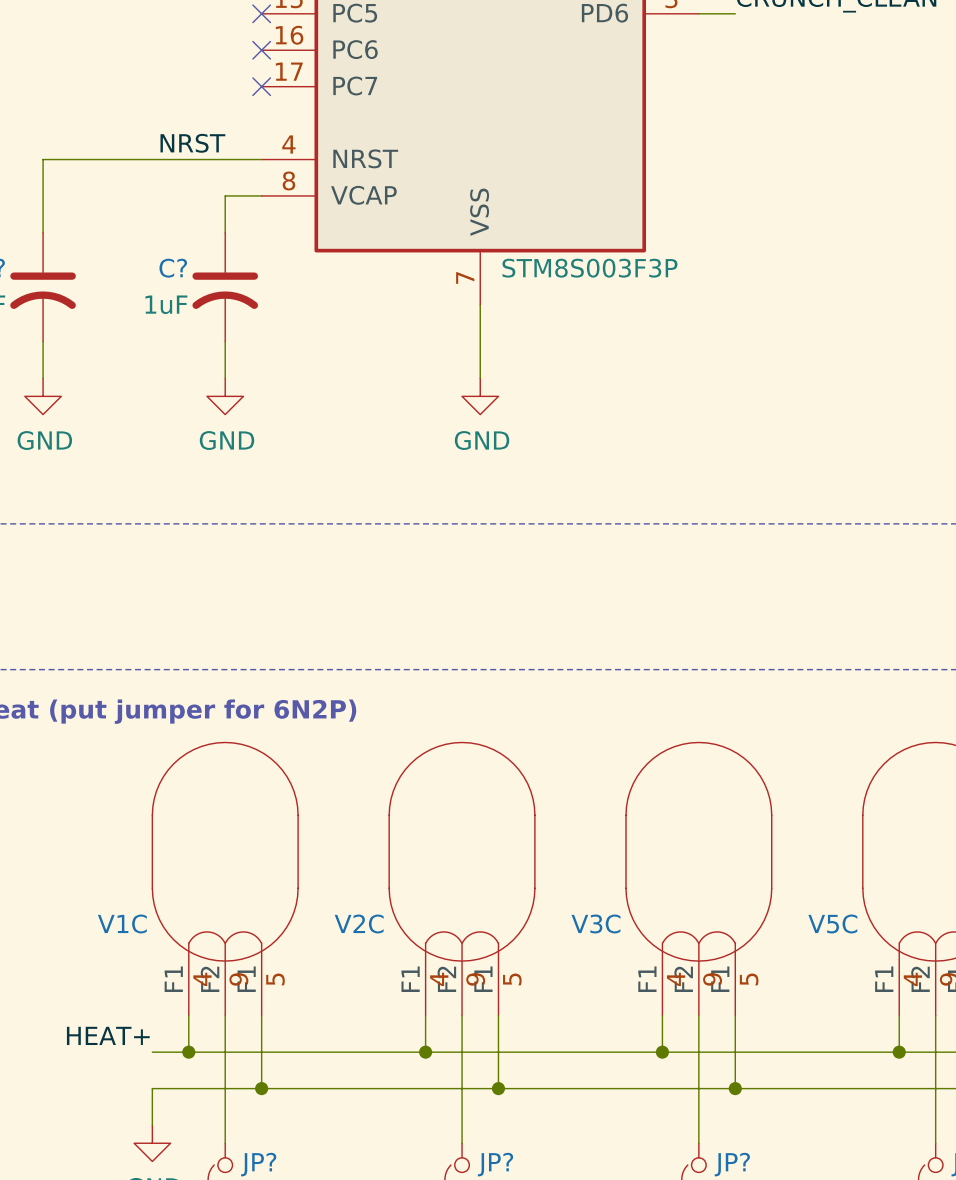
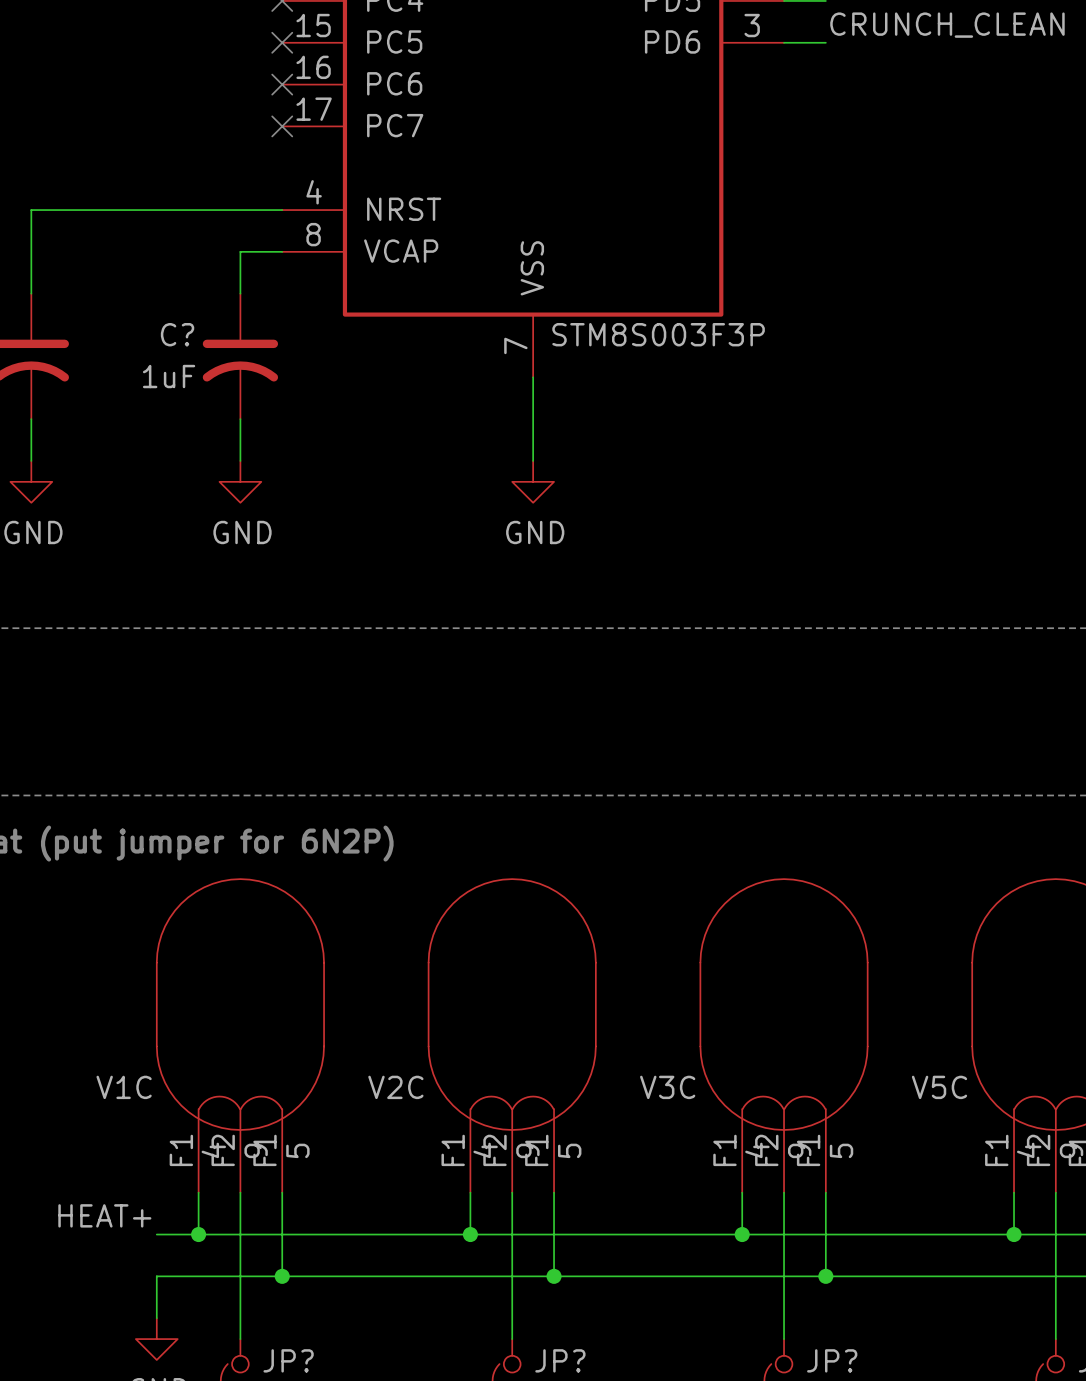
label: NRST (192, 143) -> none

